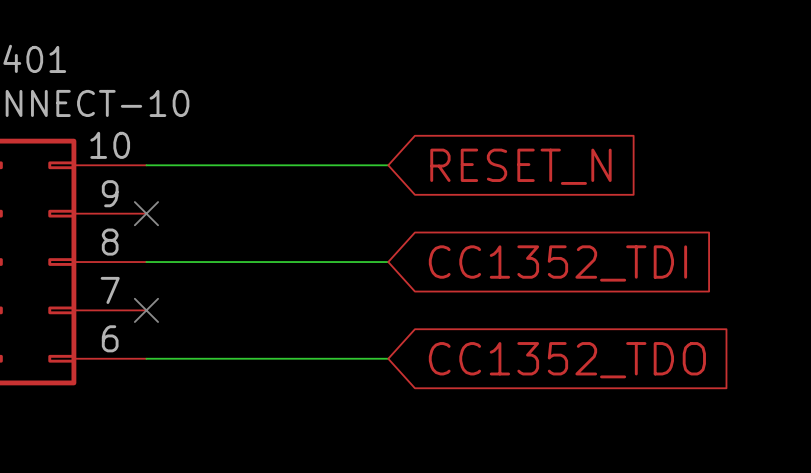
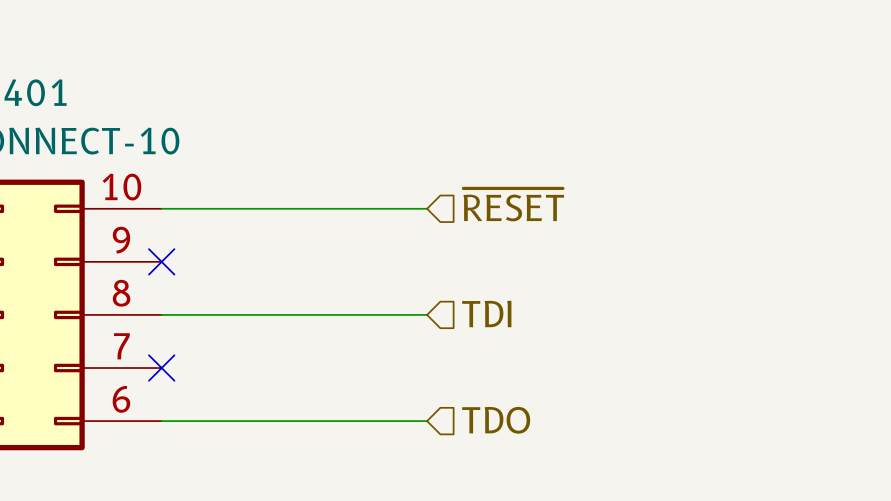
hierarchical label: none -> ~{RESET} (513, 204)
global label: RESET_N (520, 166) -> none
hierarchical label: none -> TDI (486, 313)
global label: CC1352_TDI (557, 263) -> none
hierarchical label: none -> TDO (496, 420)
global label: CC1352_TDO (567, 360) -> none

